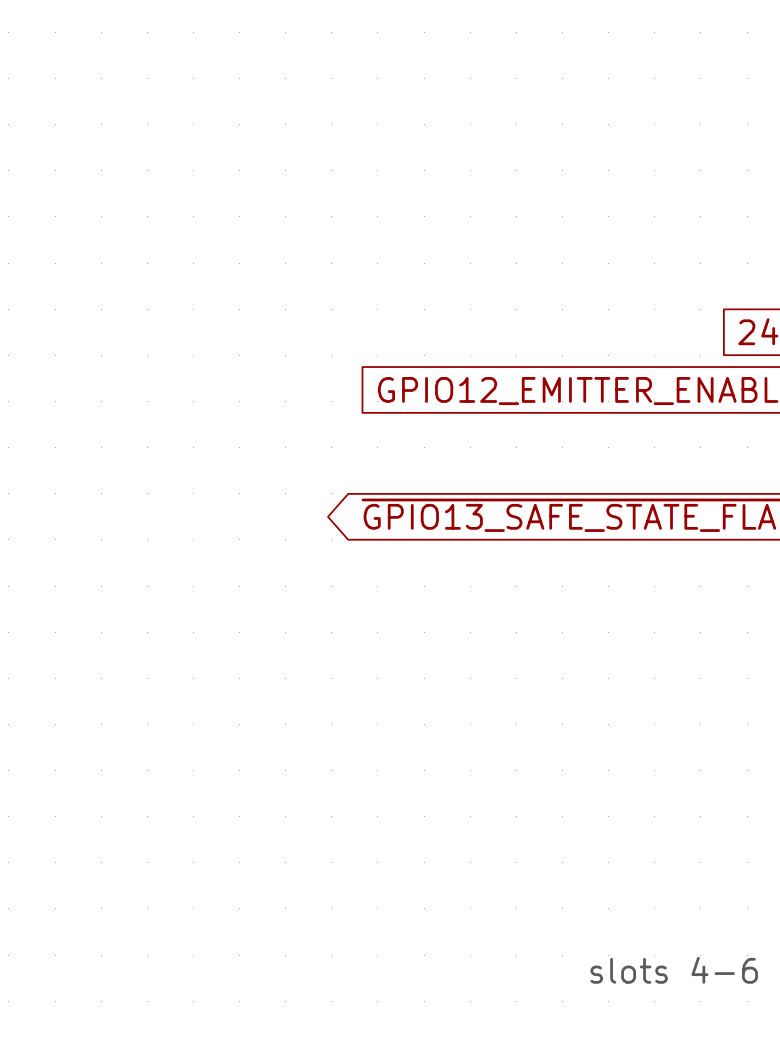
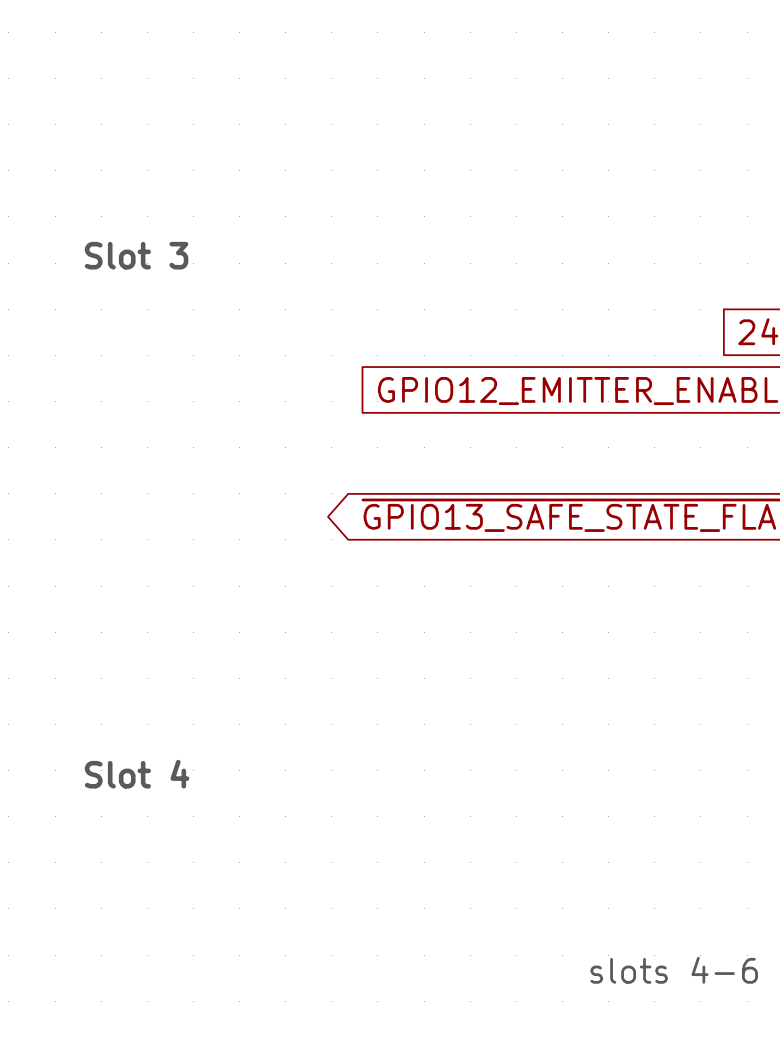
text: none -> Slot 3 (136, 255)
text: none -> Slot 4 (137, 774)

